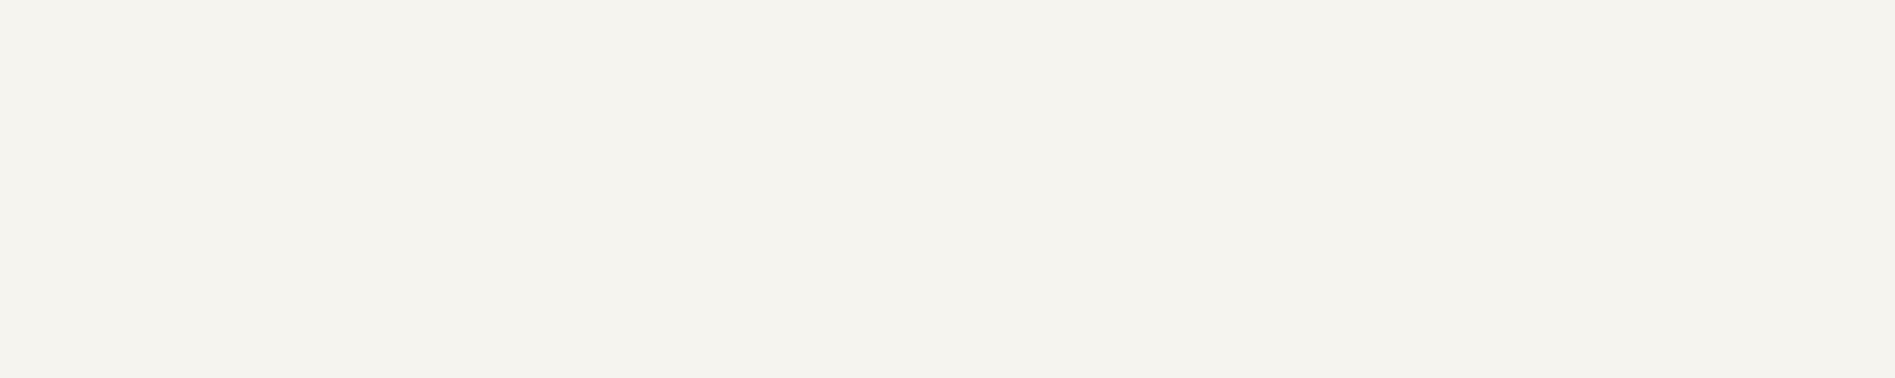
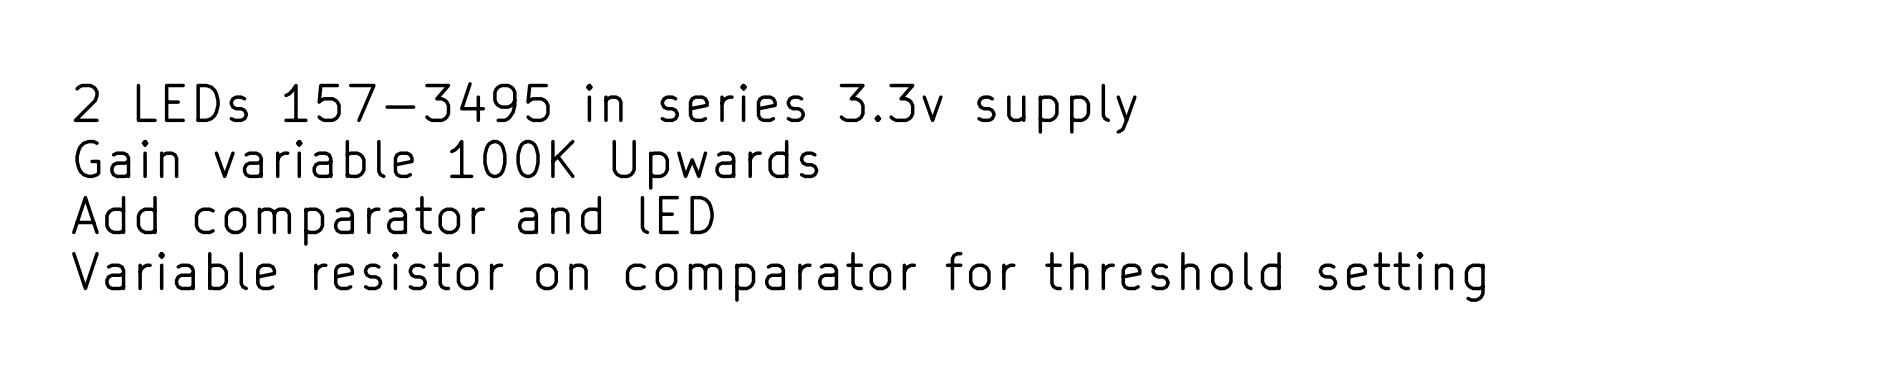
text: none -> 2 LEDs 157-3495 in series 3.3v supply (605, 107)
text: none -> Gain variable 100K Upwards (446, 164)
text: none -> Add comparator and lED (392, 220)
text: none -> Variable resistor on comparator for threshold setting (778, 276)

